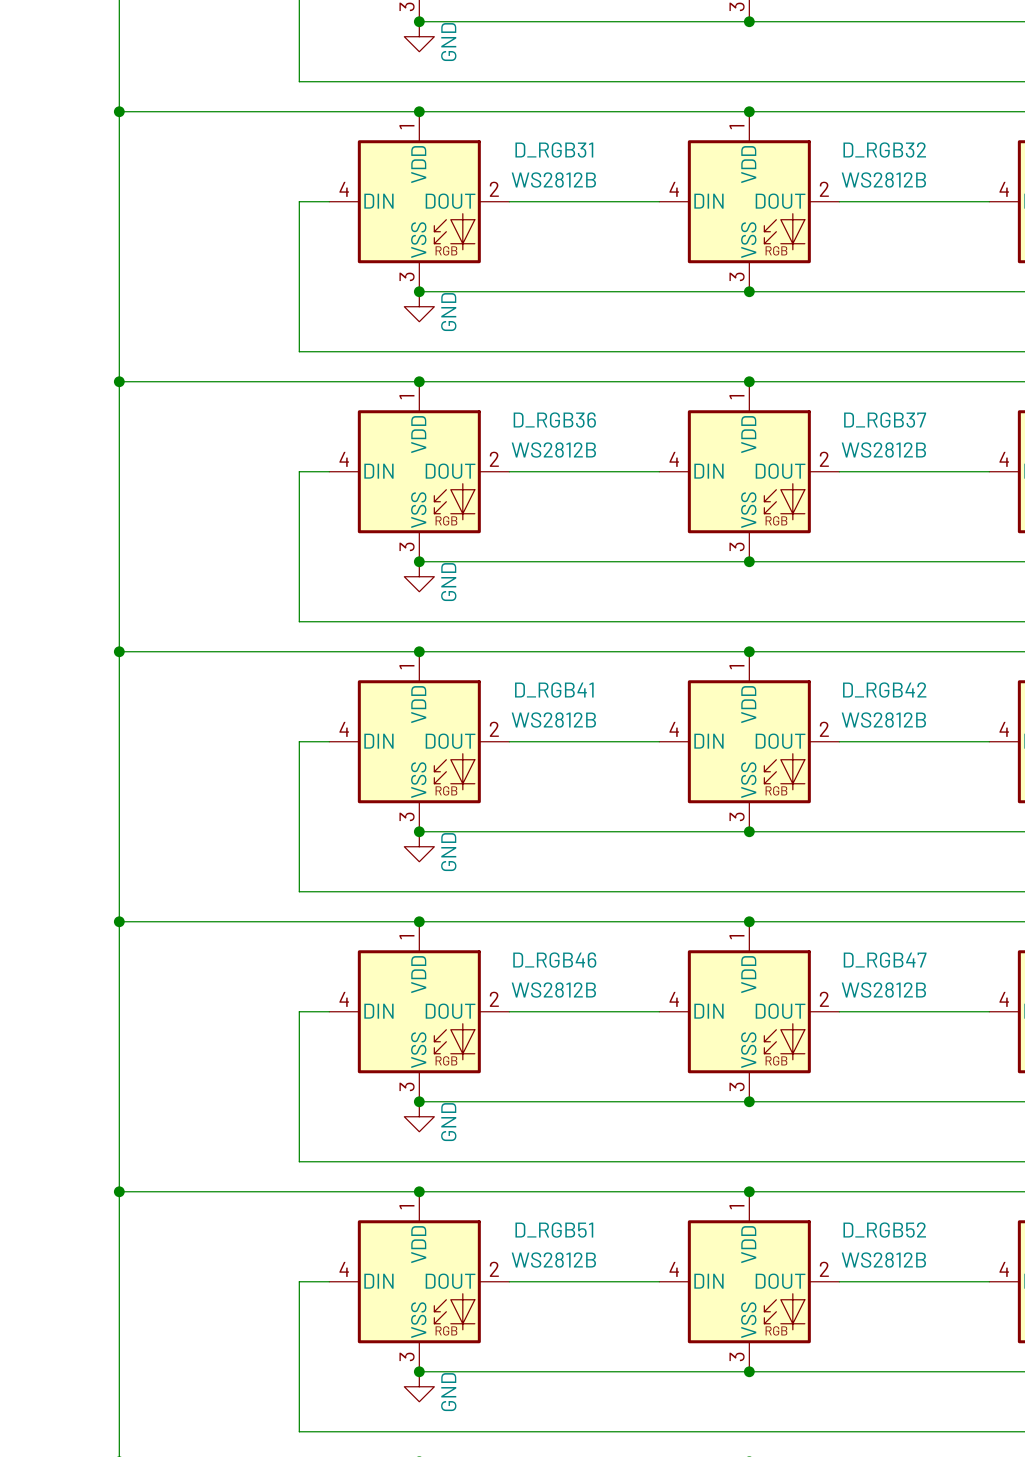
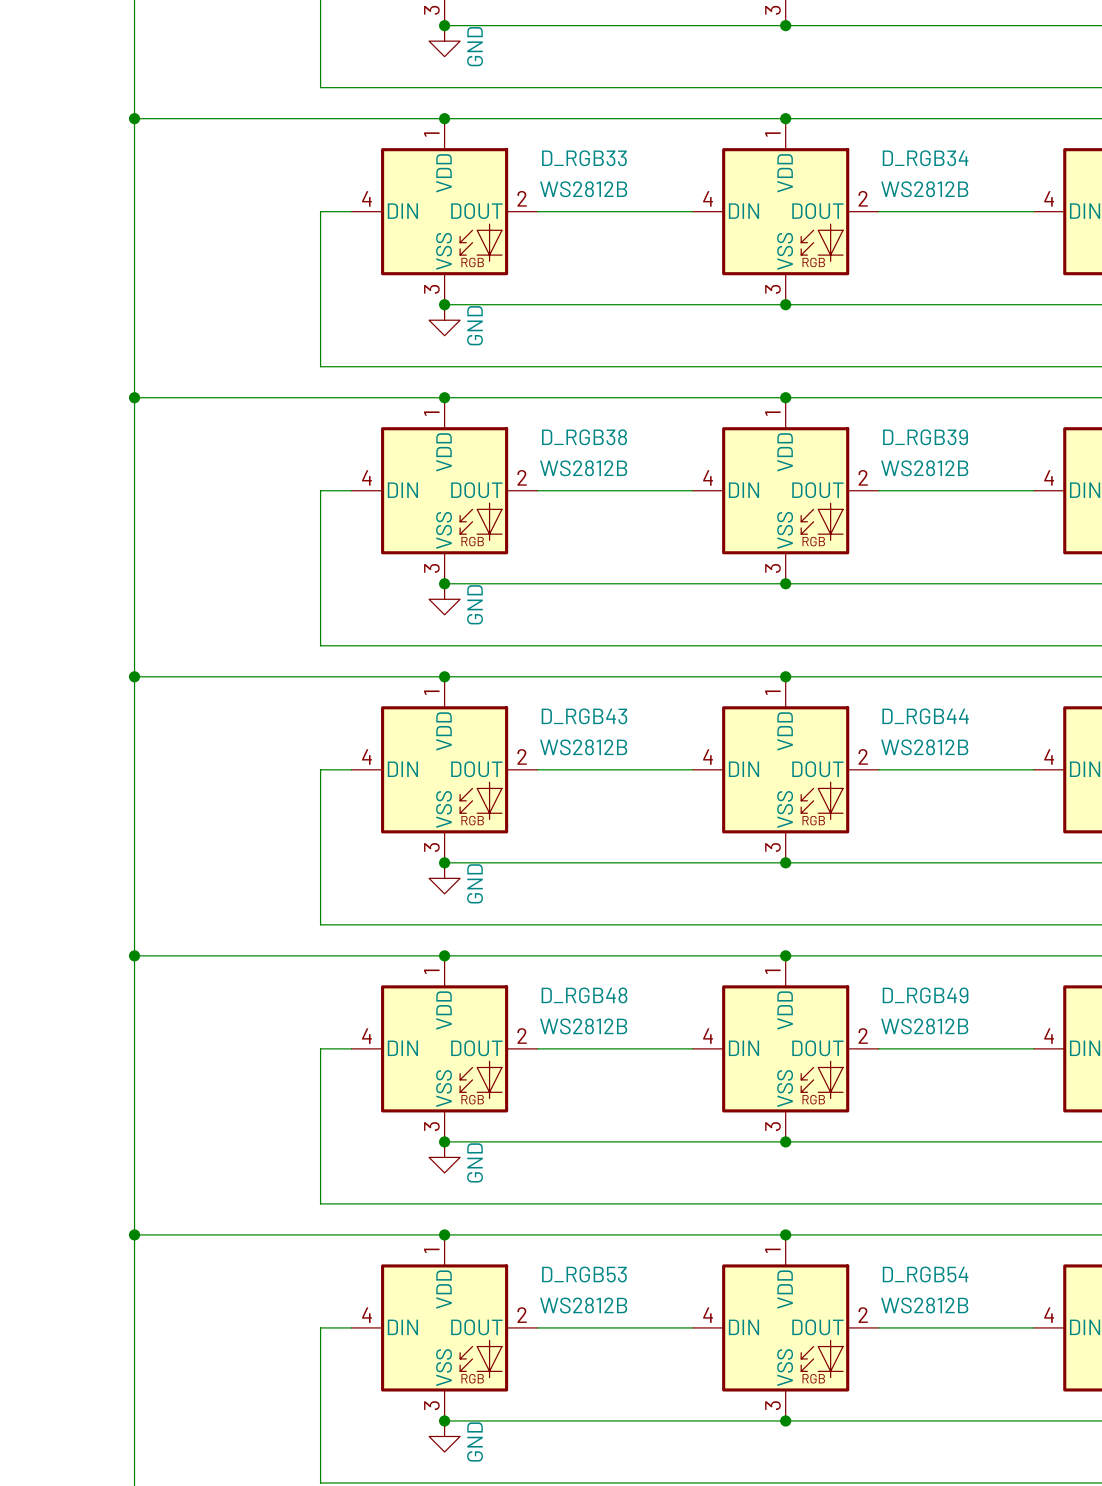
D_RGB31 name: D_RGB31 (554, 150) -> D_RGB33 (584, 158)
D_RGB32 name: D_RGB32 (884, 150) -> D_RGB34 (925, 158)
D_RGB36 name: D_RGB36 (554, 420) -> D_RGB38 (584, 437)
D_RGB37 name: D_RGB37 (885, 420) -> D_RGB39 (925, 437)
D_RGB41 name: D_RGB41 (554, 690) -> D_RGB43 (584, 716)
D_RGB42 name: D_RGB42 (884, 690) -> D_RGB44 (925, 716)
D_RGB46 name: D_RGB46 (554, 960) -> D_RGB48 (584, 995)
D_RGB47 name: D_RGB47 (885, 960) -> D_RGB49 (925, 995)
D_RGB51 name: D_RGB51 (554, 1230) -> D_RGB53 (584, 1274)
D_RGB52 name: D_RGB52 (884, 1230) -> D_RGB54 (925, 1274)

